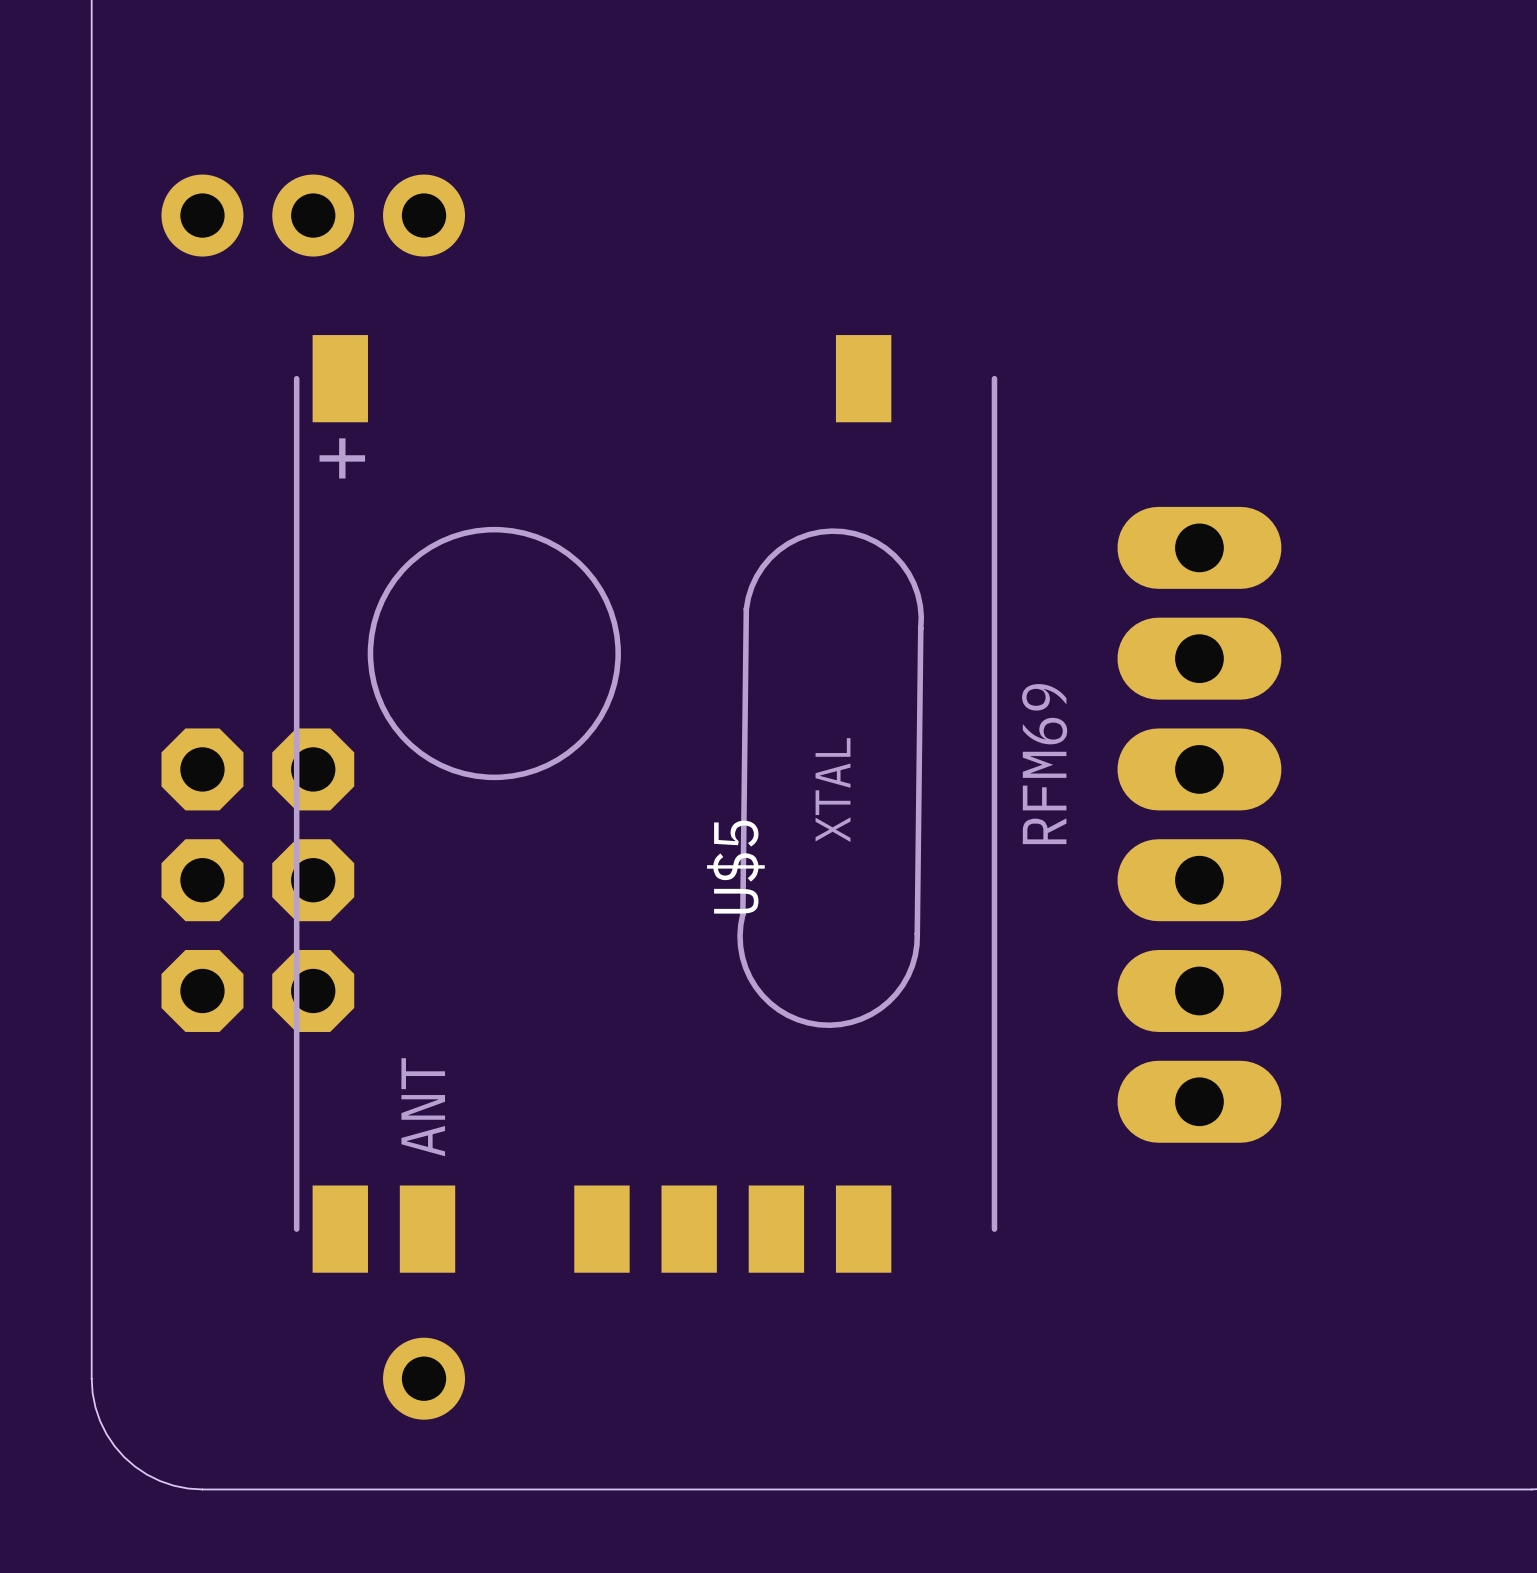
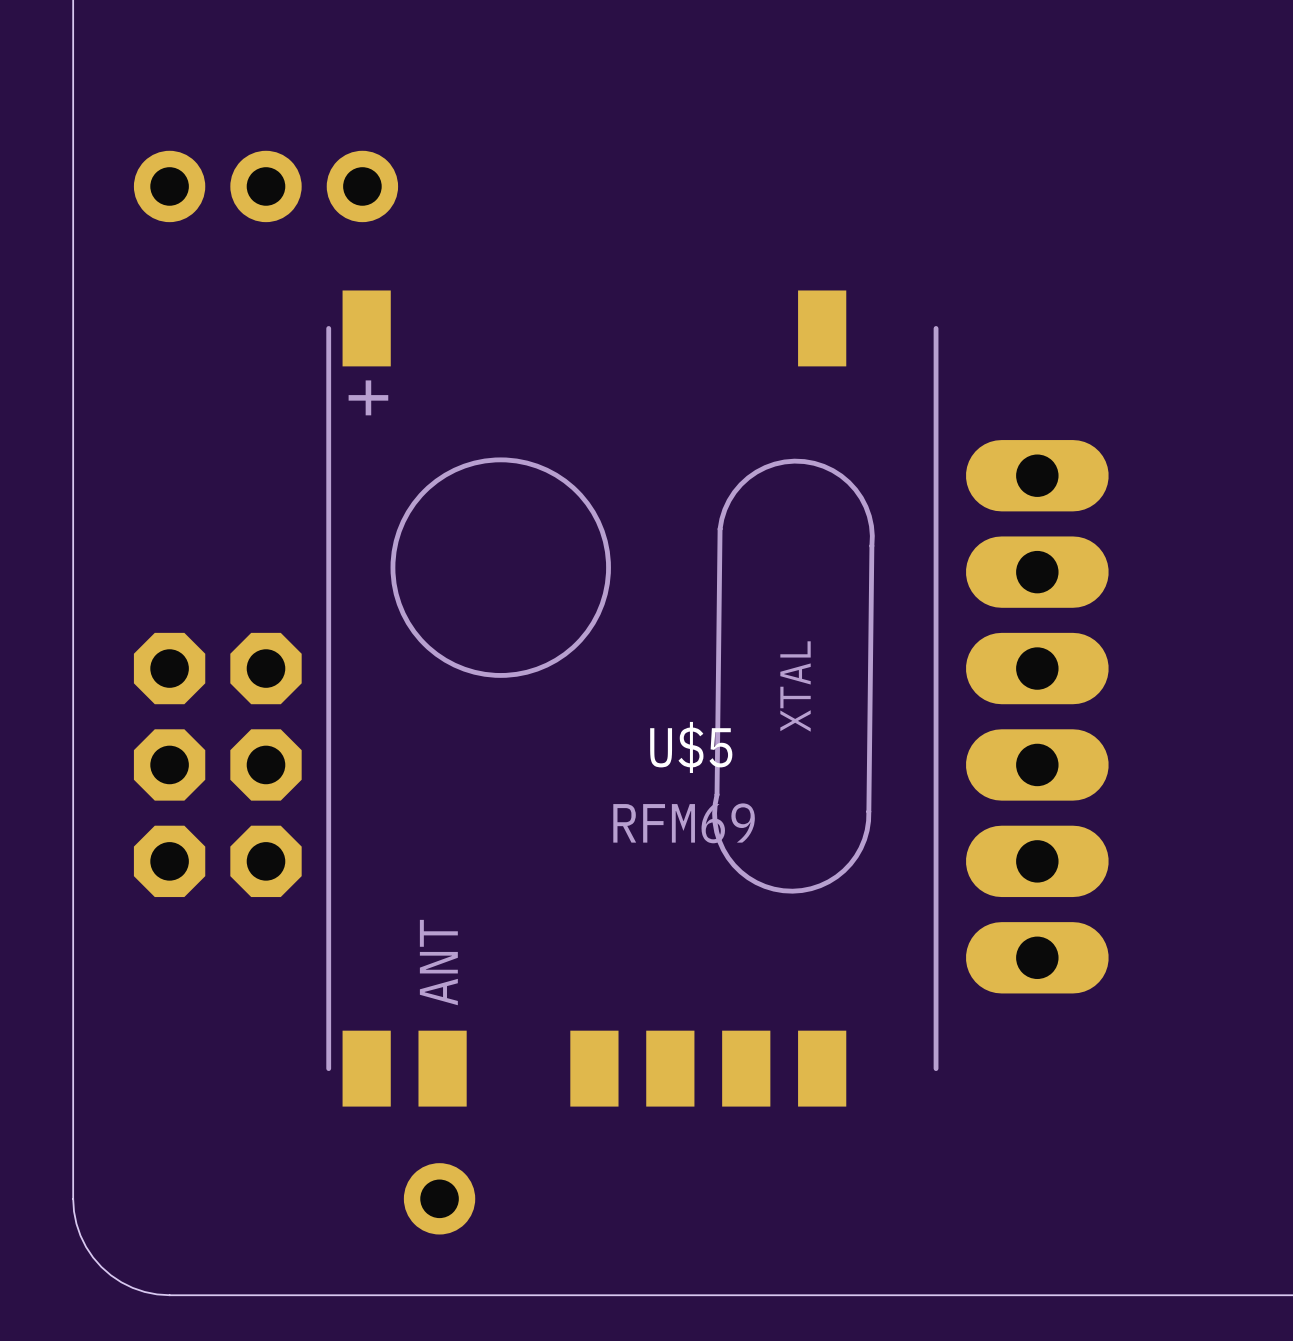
U$5 value rotation: 0° (1044, 764) -> 90° clockwise (684, 823)
U$5 value position: RFM69 (1044, 764) -> RFM69 (684, 823)
U$5 position: (645, 803) -> (632, 698)
U$5 name rotation: 0° (735, 867) -> 90° clockwise (691, 747)
part position: (424, 1378) -> (439, 1198)

